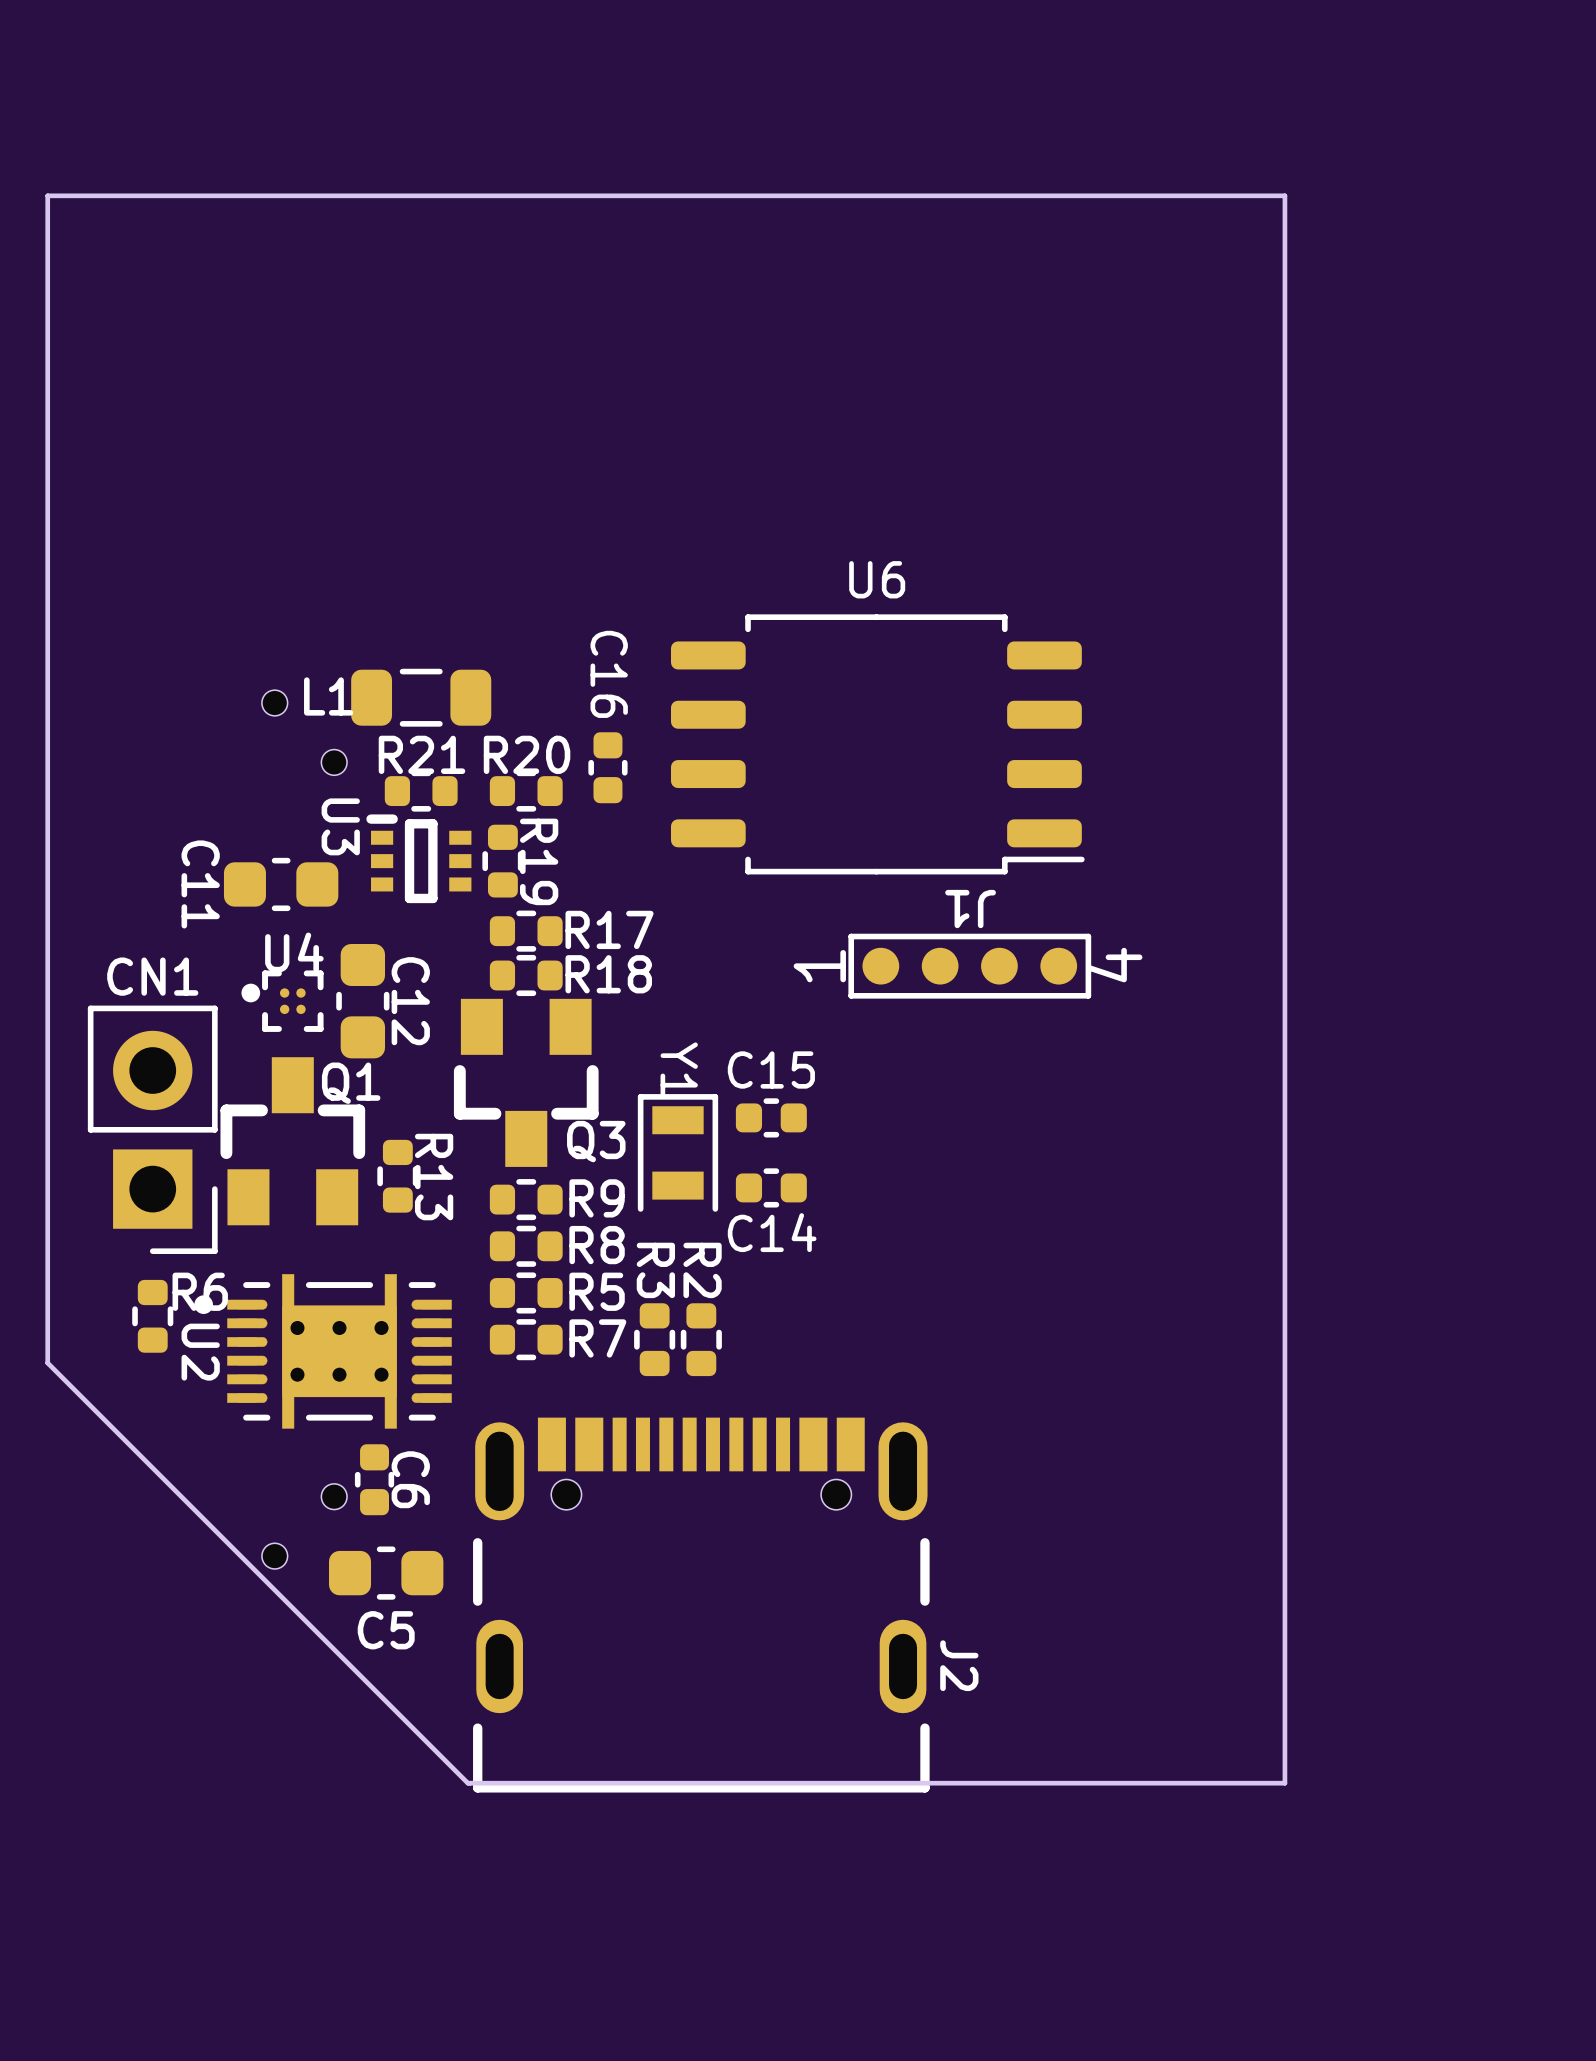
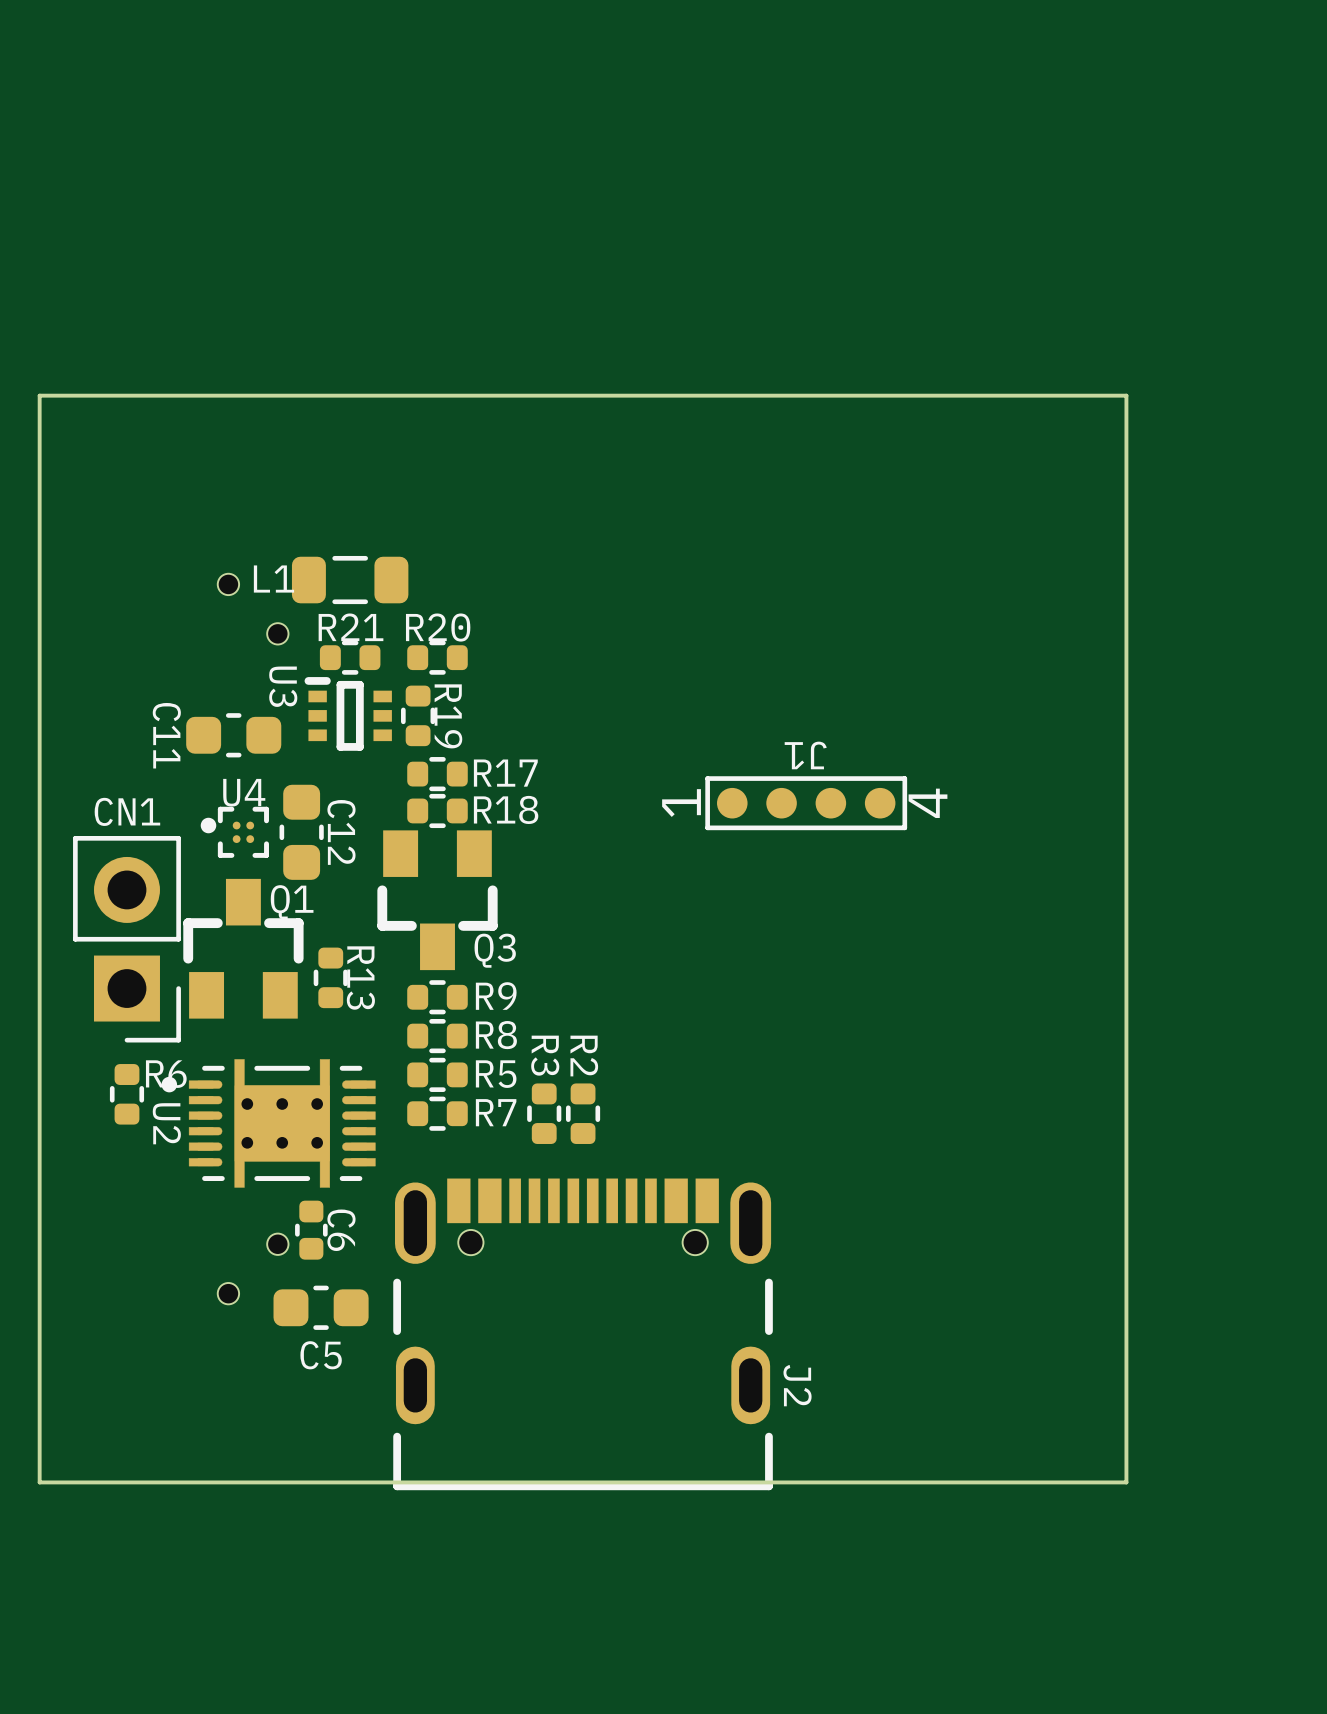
board edge: (47, 475) (47, 195) (1284, 195) (1284, 1783) -> (39, 395) (1126, 395) (1126, 1482) (1068, 1482)
U6: (877, 744) -> none
C16: (607, 767) -> none
C15: (771, 1117) -> none
Y1: (677, 1152) -> none
C14: (771, 1187) -> none
board edge: (47, 1363) (467, 1783) -> (39, 1133) (39, 1482) (388, 1482)

